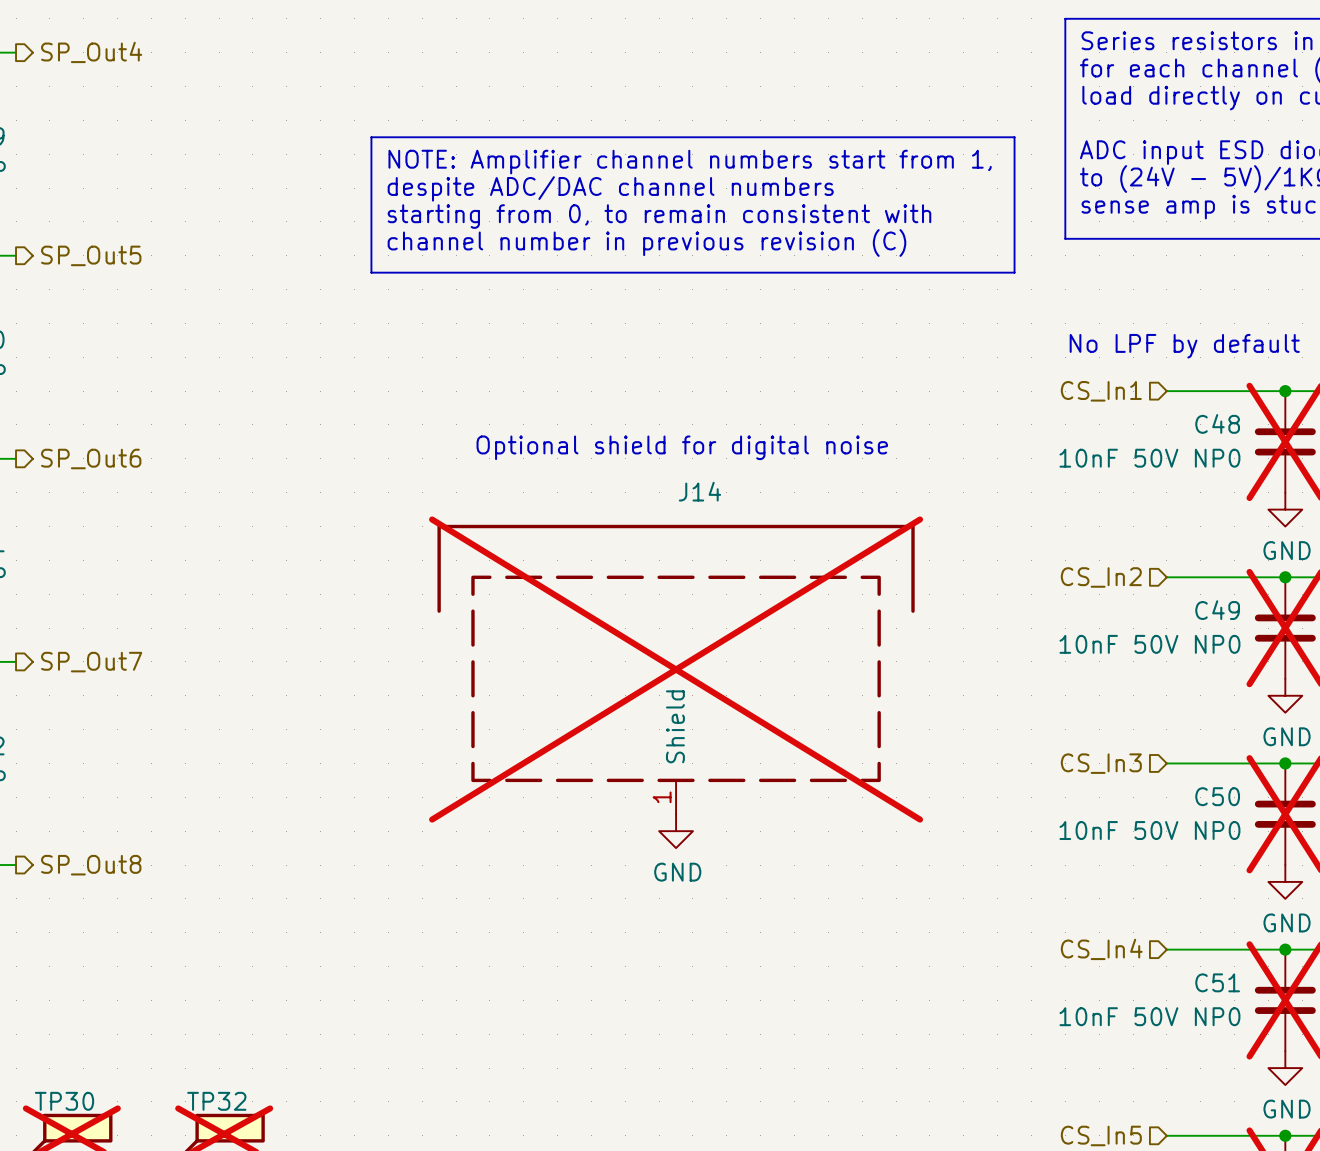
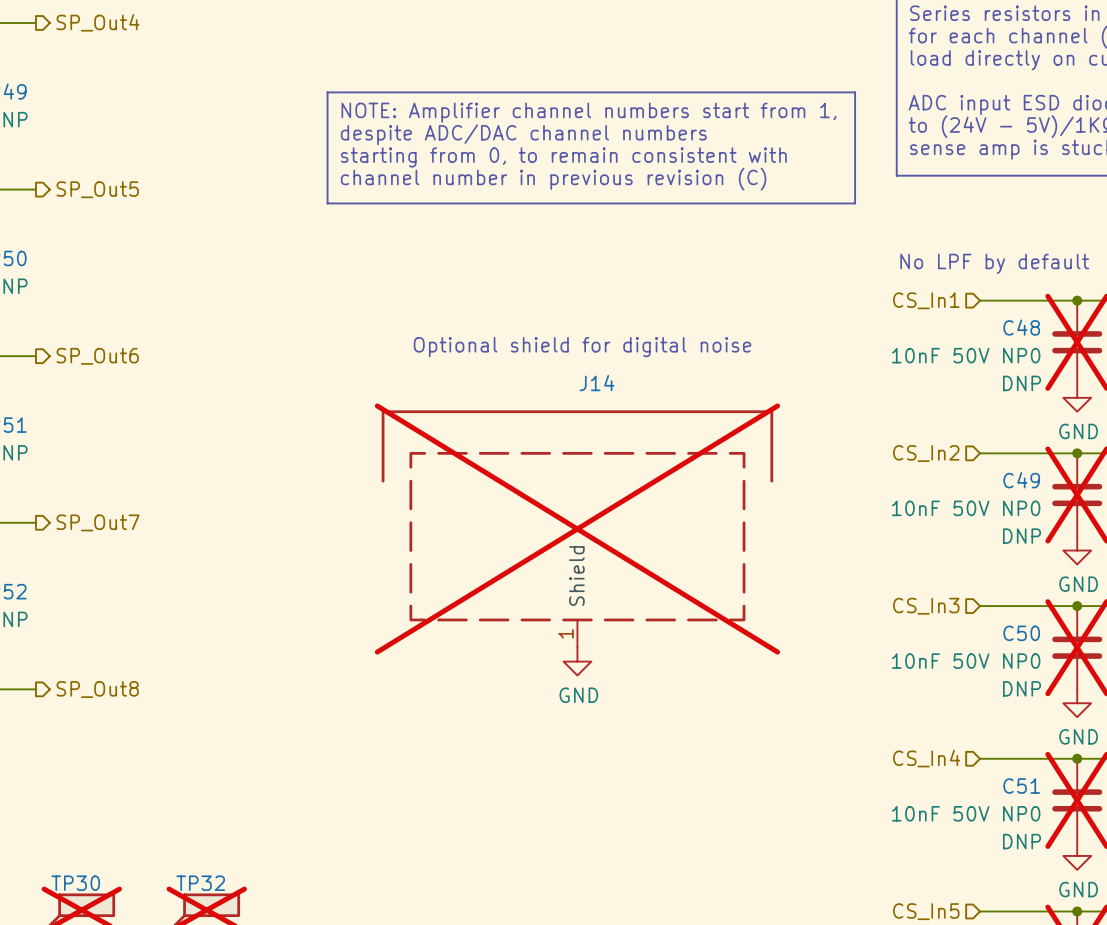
C48 text: none -> DNP (1022, 383)
C49 text: none -> DNP (1022, 536)
C50 text: none -> DNP (1022, 688)
C51 text: none -> DNP (1022, 841)

